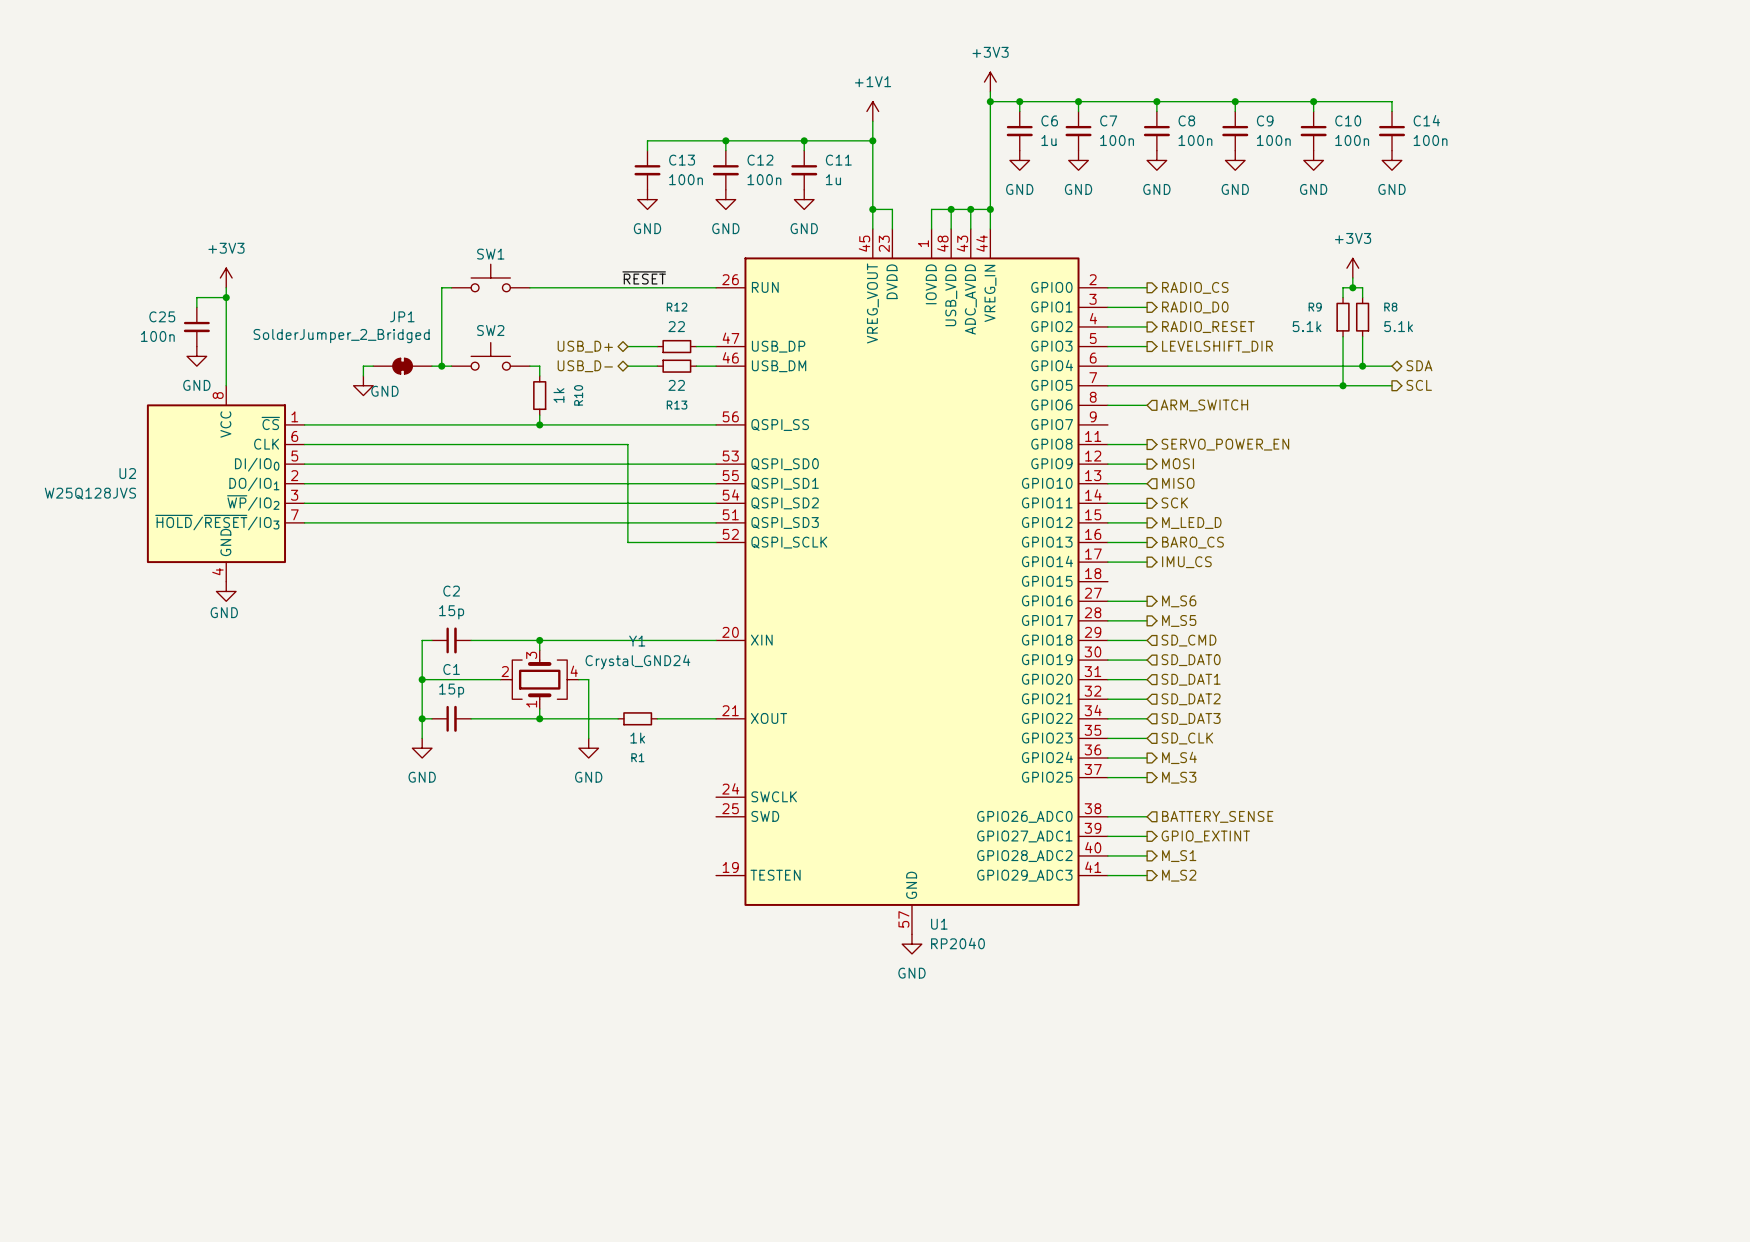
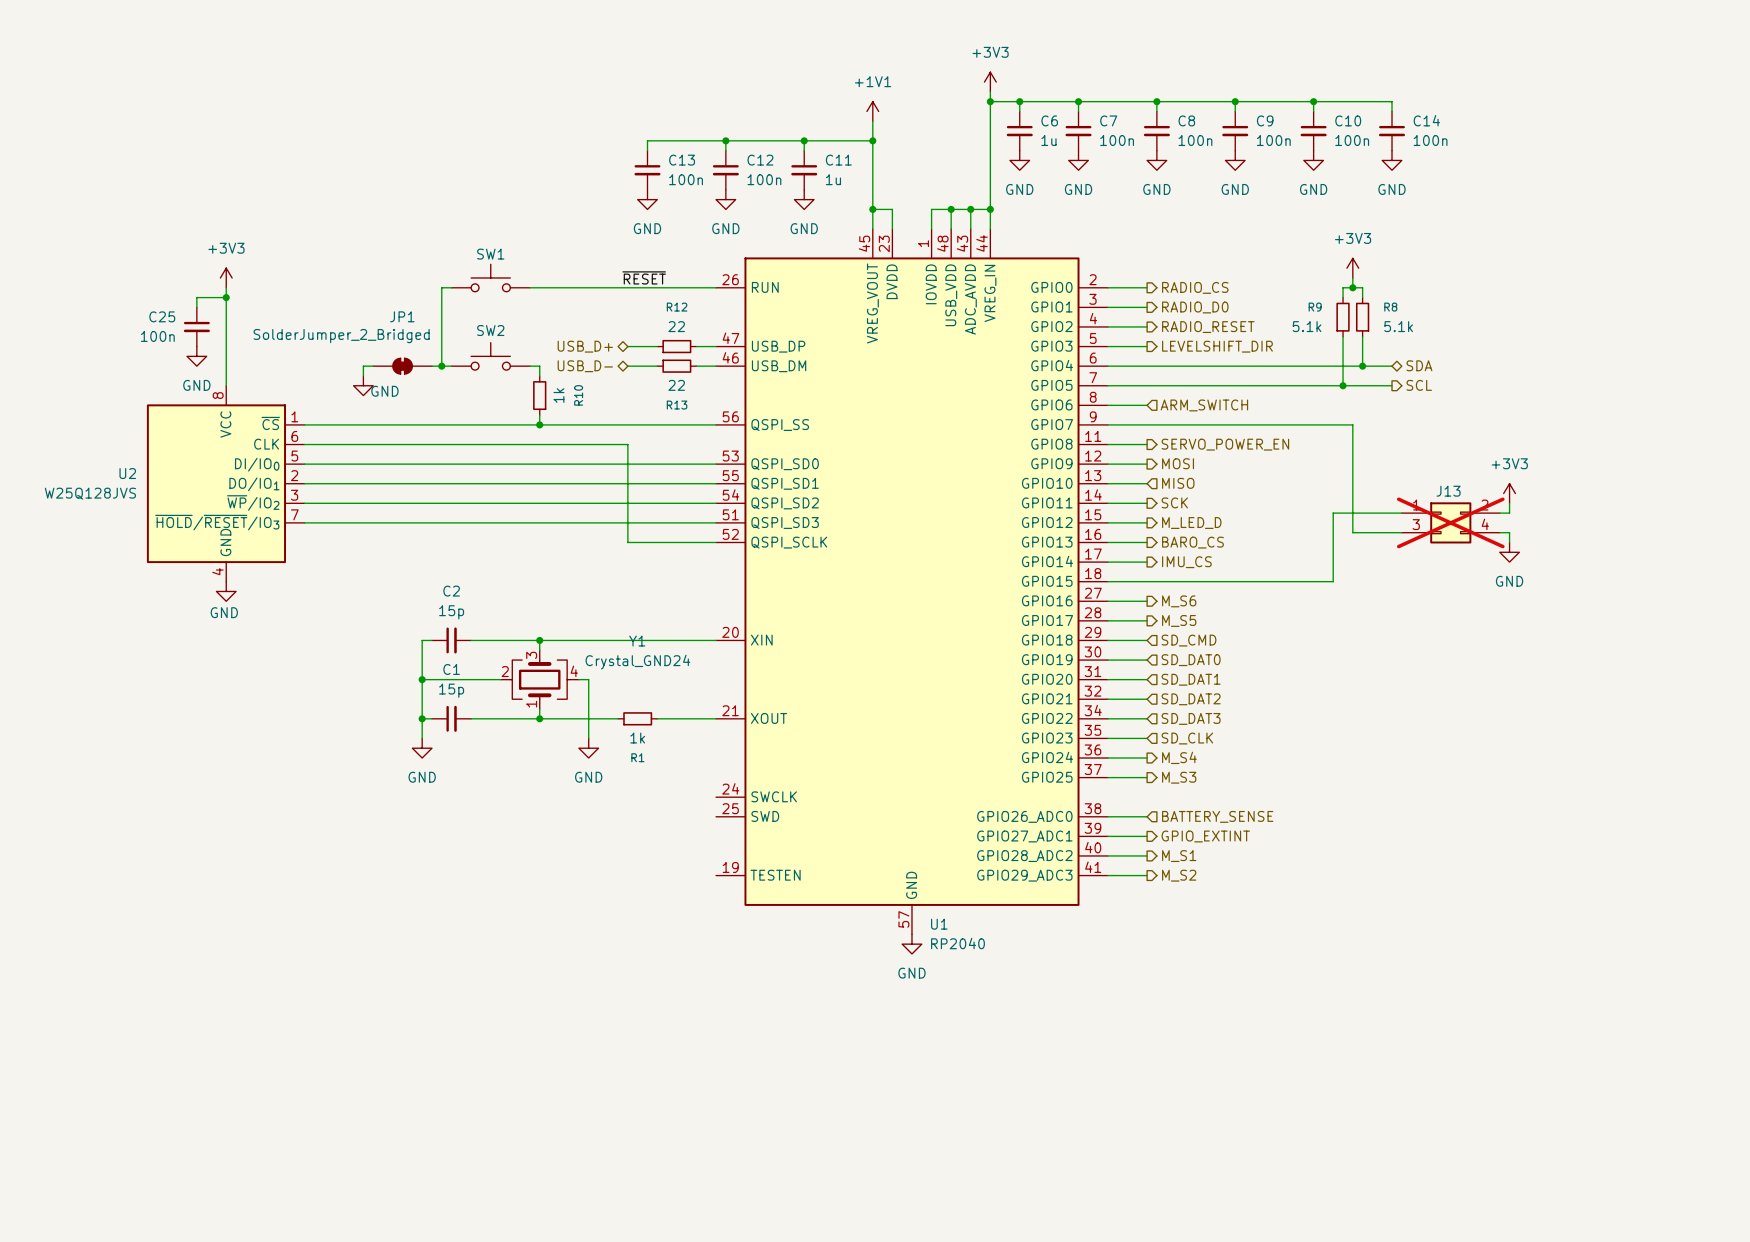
wire: none -> (1107, 424) (1352, 424) (1352, 532) (1401, 532)
power symbol: none -> +3V3 (1509, 493)
wire: none -> (1509, 503) (1509, 513) (1499, 513)
wire: none -> (1401, 513) (1333, 513) (1333, 581) (1107, 581)
J13: none -> (1450, 522)
wire: none -> (1499, 532) (1509, 532) (1509, 542)
power symbol: none -> GND (1509, 552)

